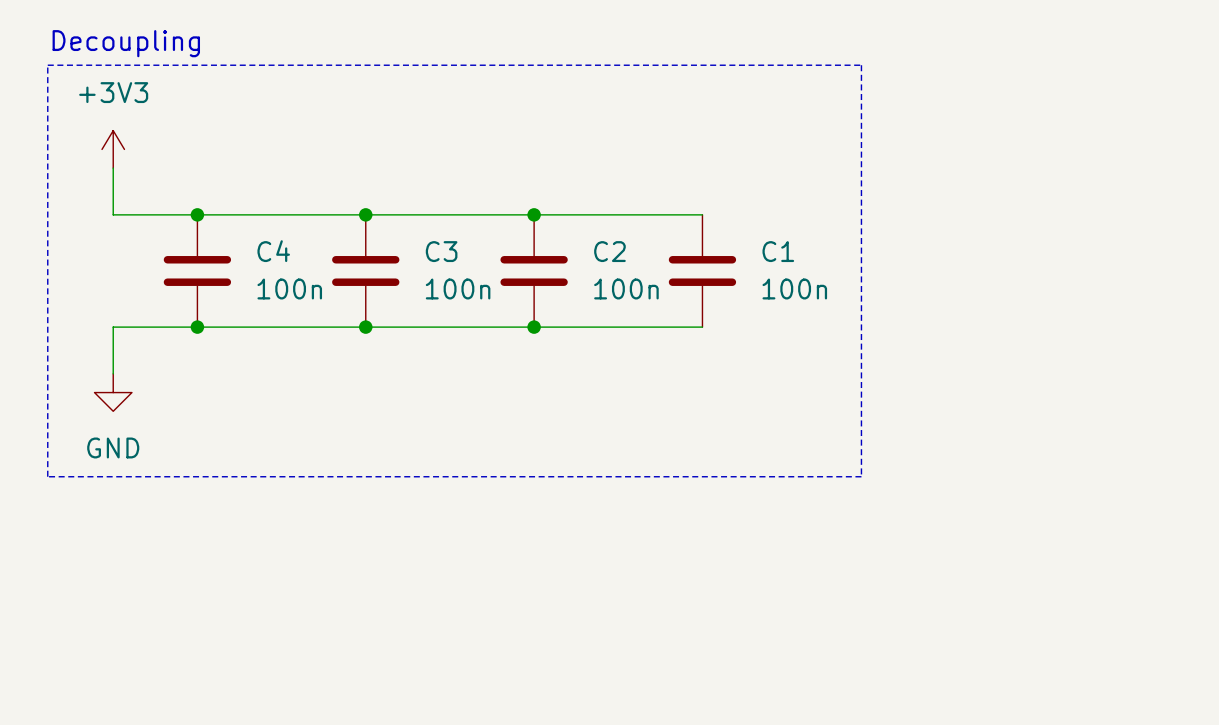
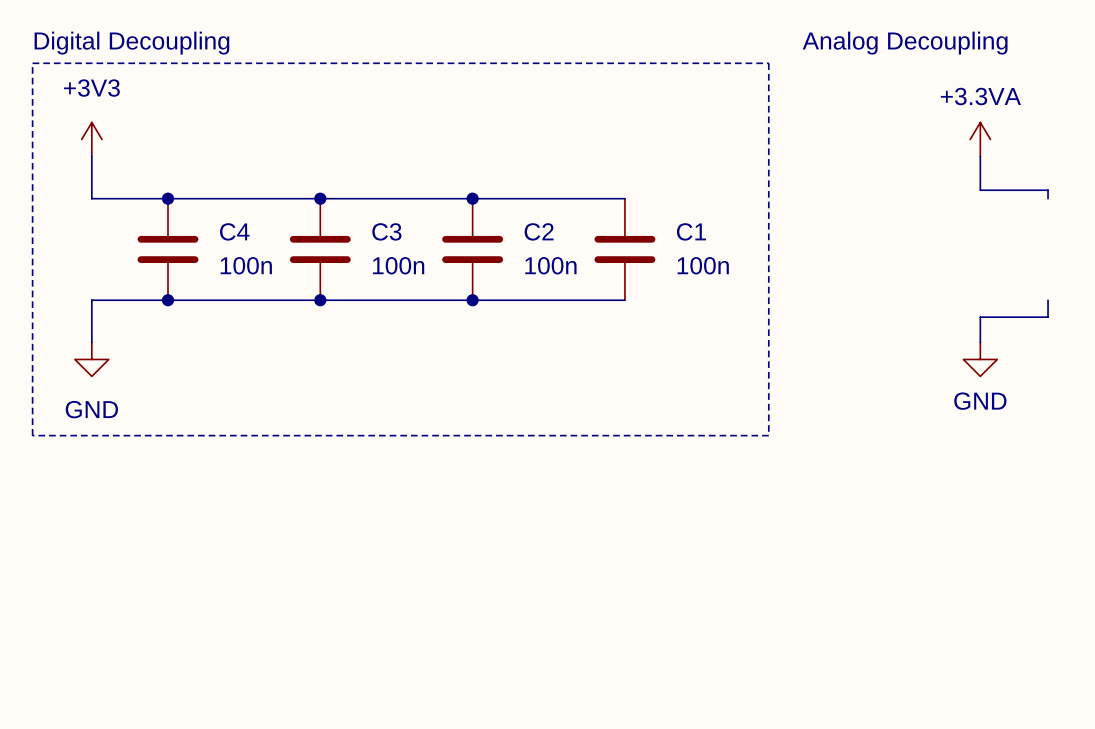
text: Decoupling (126, 43) -> Digital Decoupling (131, 43)
text: none -> Analog Decoupling (905, 43)
power symbol: none -> +3.3VA (980, 139)
wire: none -> (980, 156) (980, 190) (1048, 190) (1048, 198)
wire: none -> (1048, 300) (1048, 317) (980, 317) (980, 342)
power symbol: none -> GND (980, 359)

